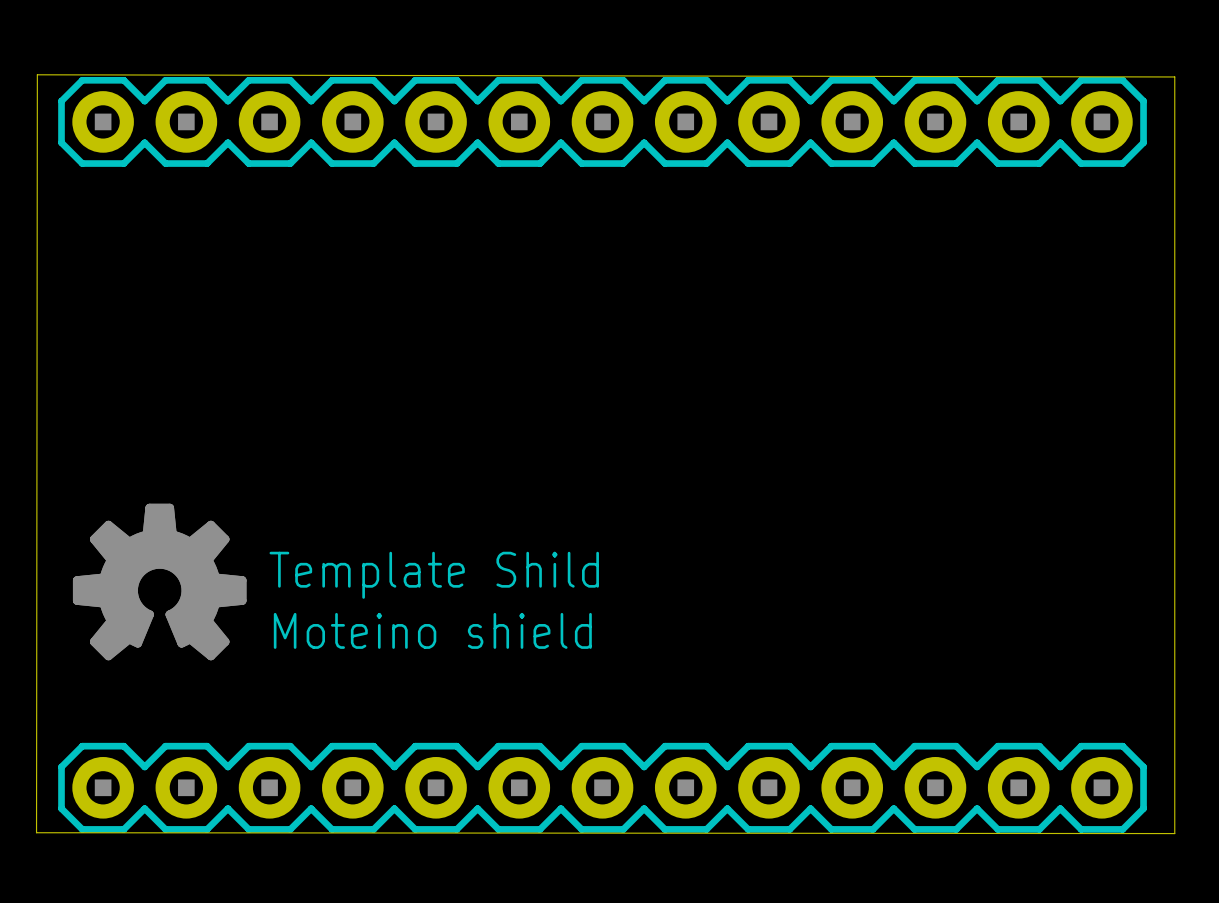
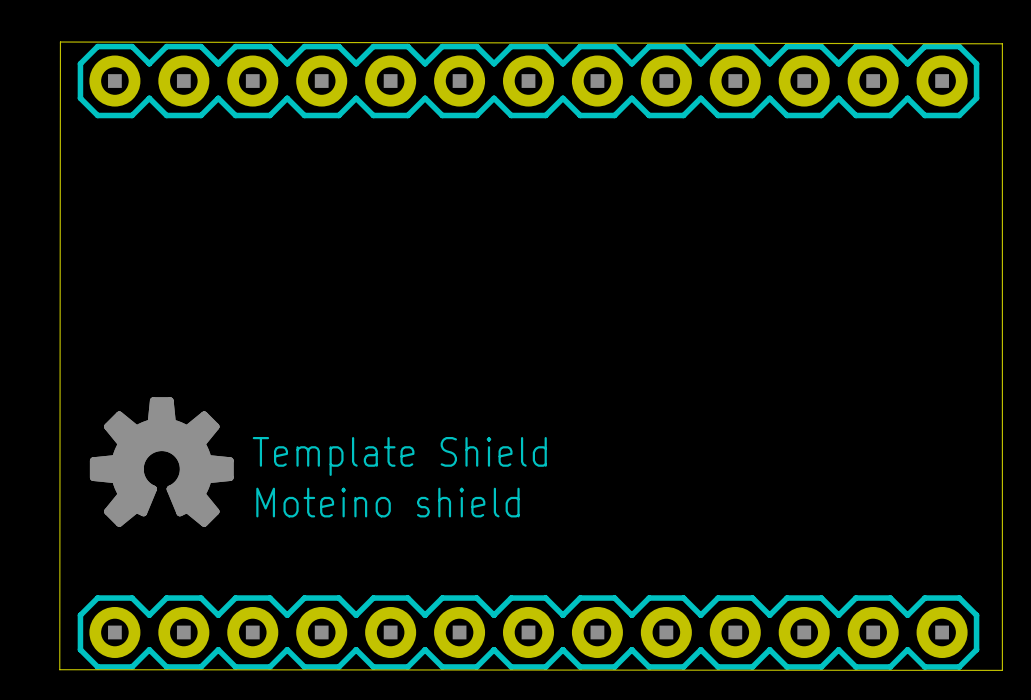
text: Template Shild (434, 575) -> Template Shield (399, 456)

